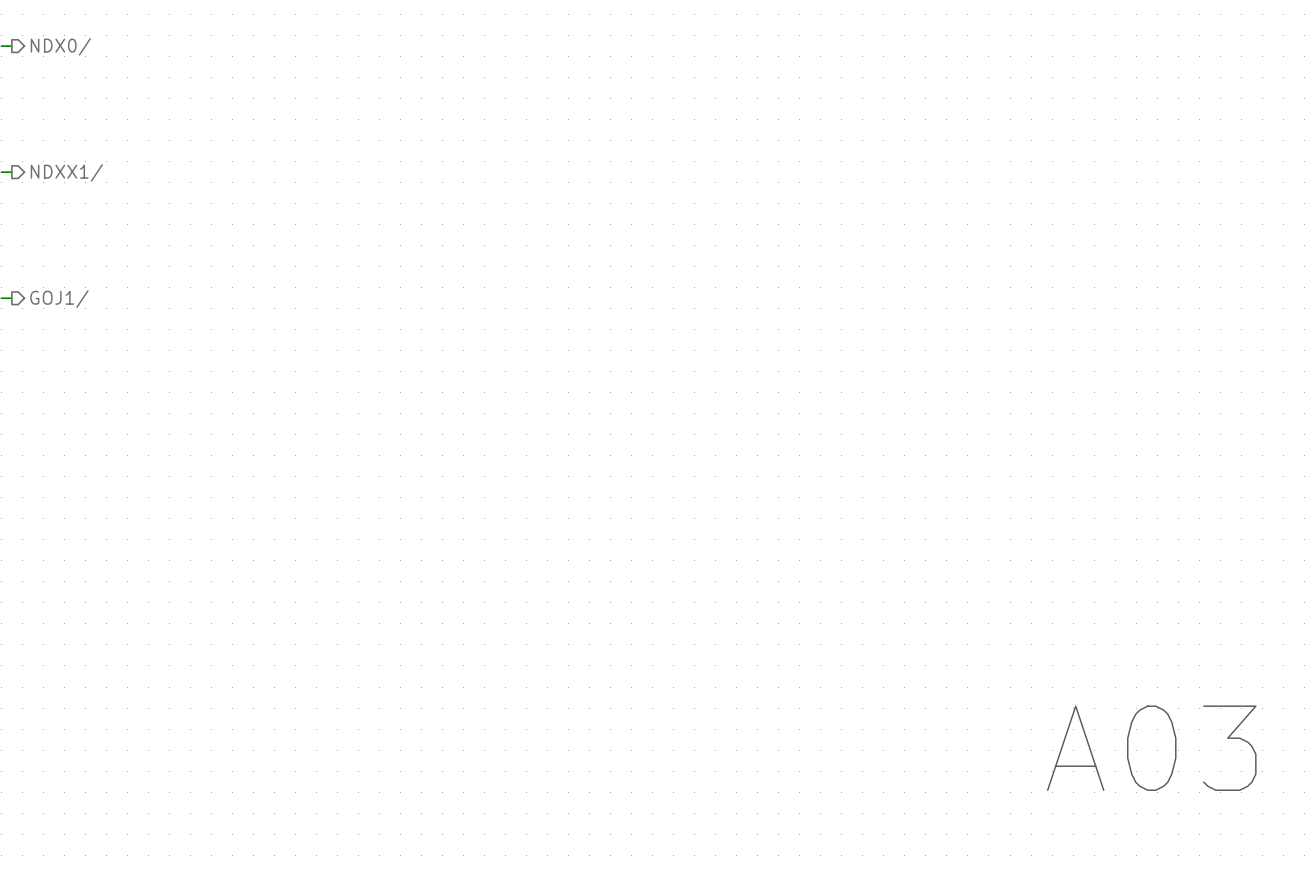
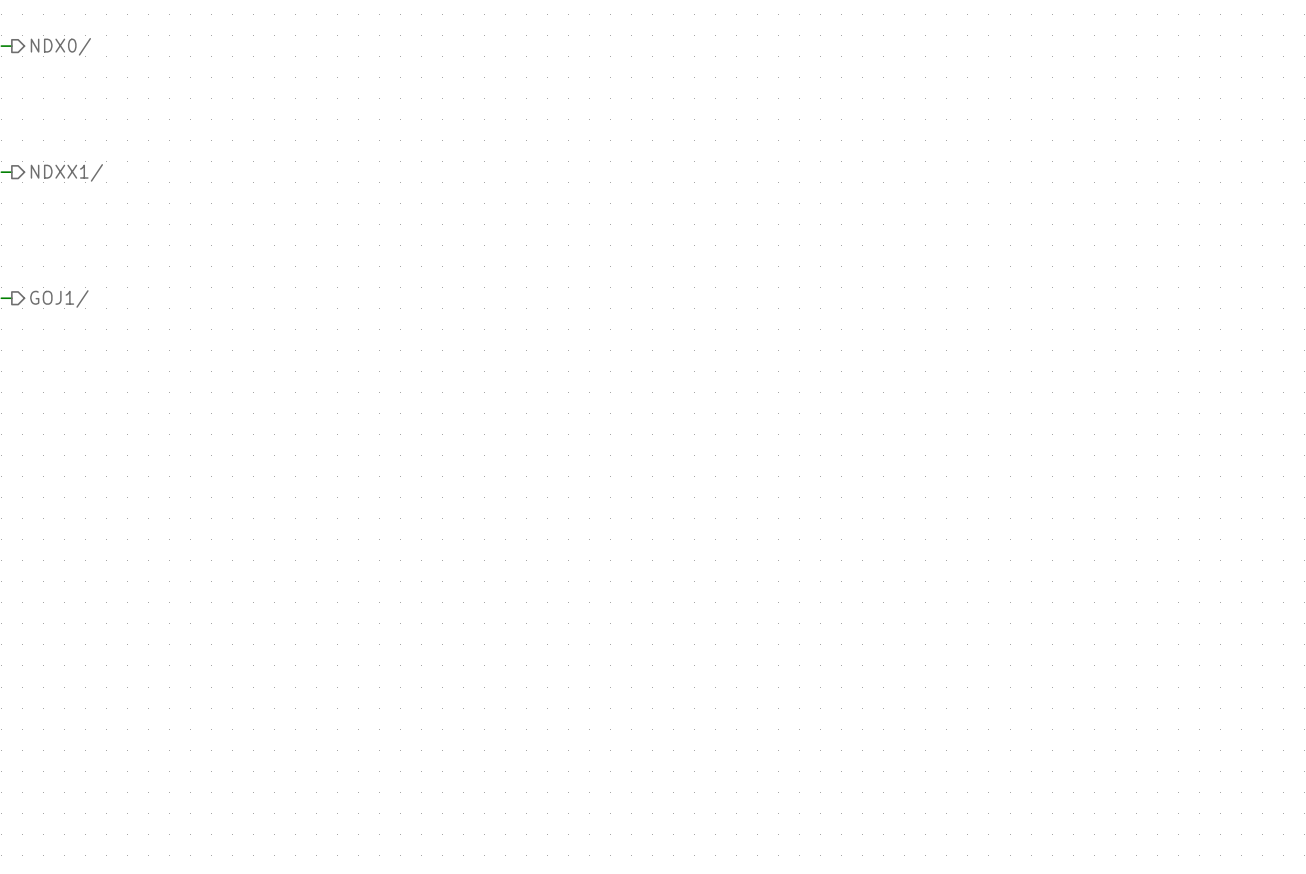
text: A03 (1151, 748) -> none

